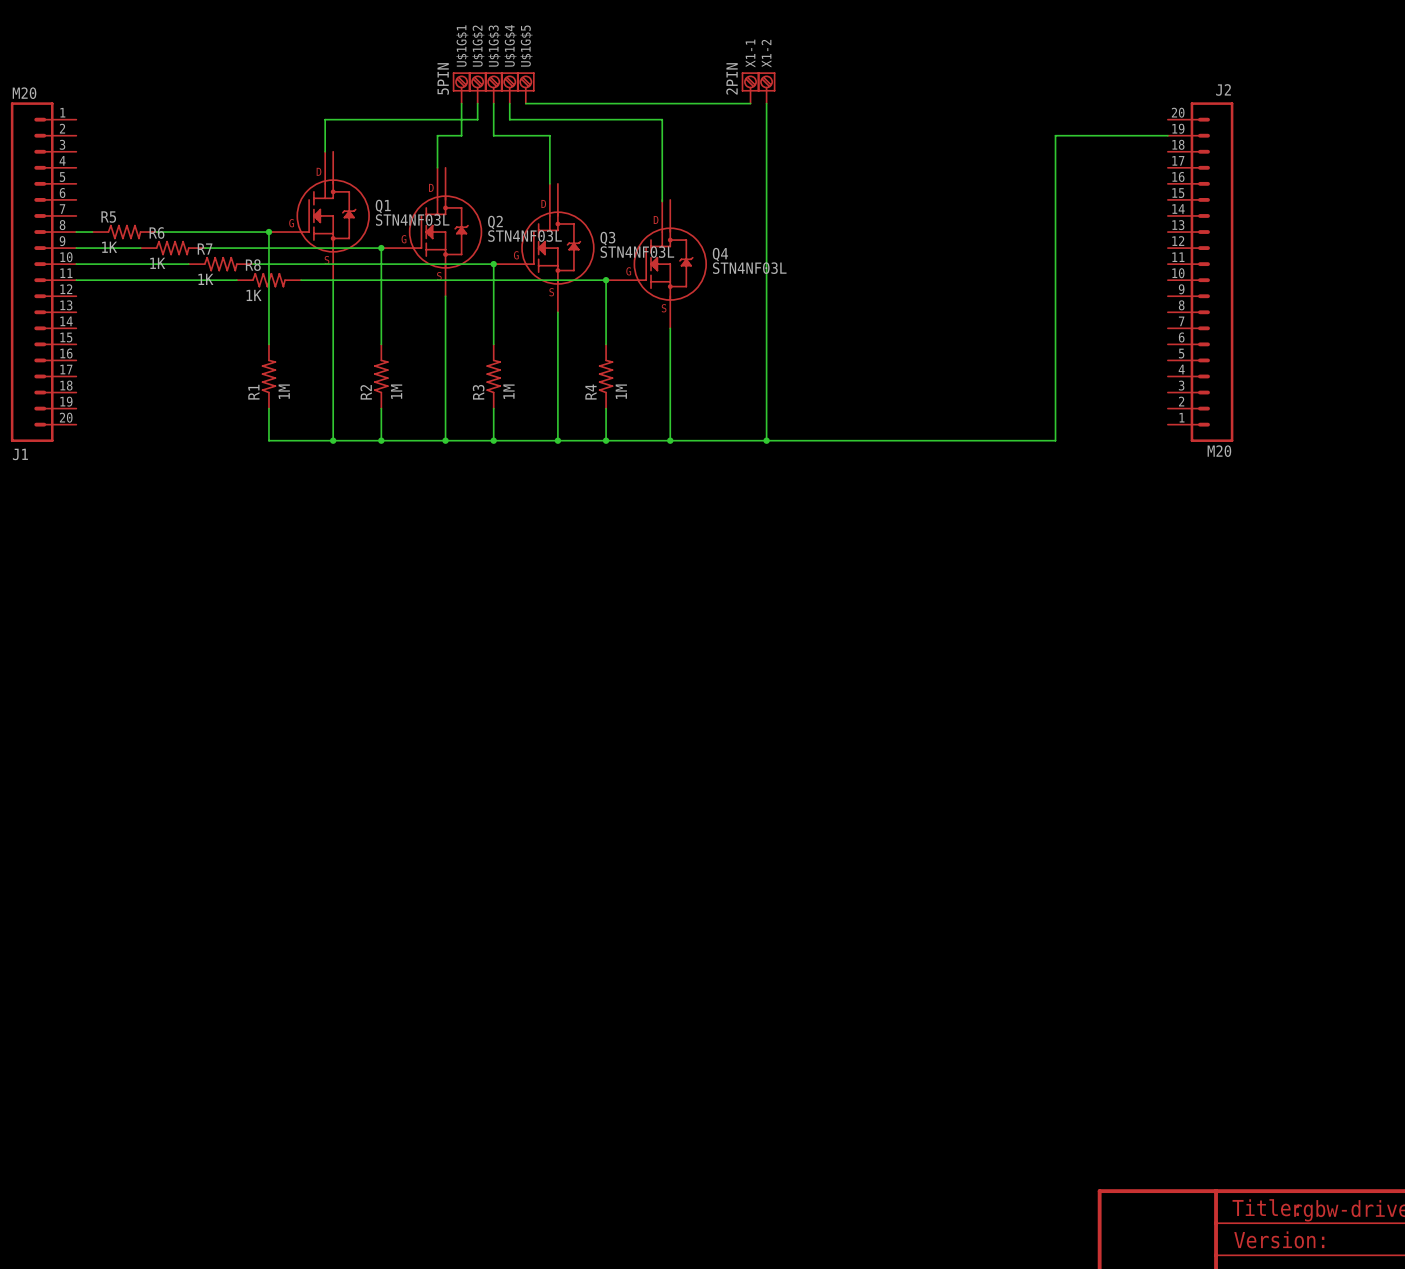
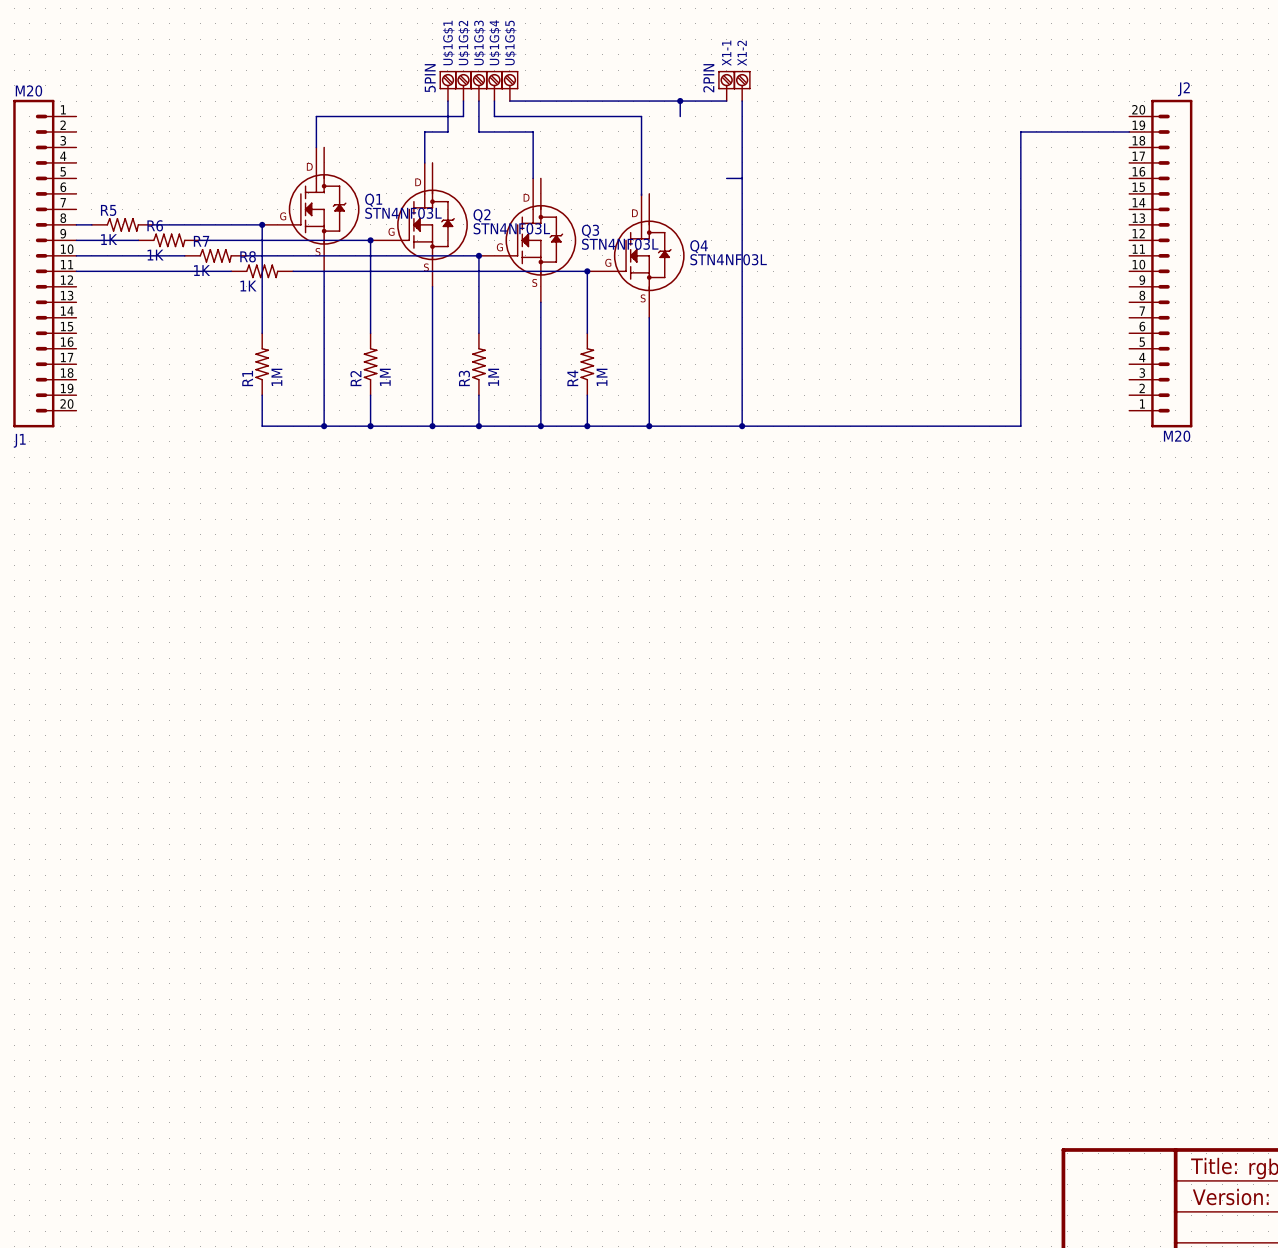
wire: none -> (680, 101) (680, 116)
junction: none -> (680, 101)
wire: none -> (726, 178) (742, 178)

